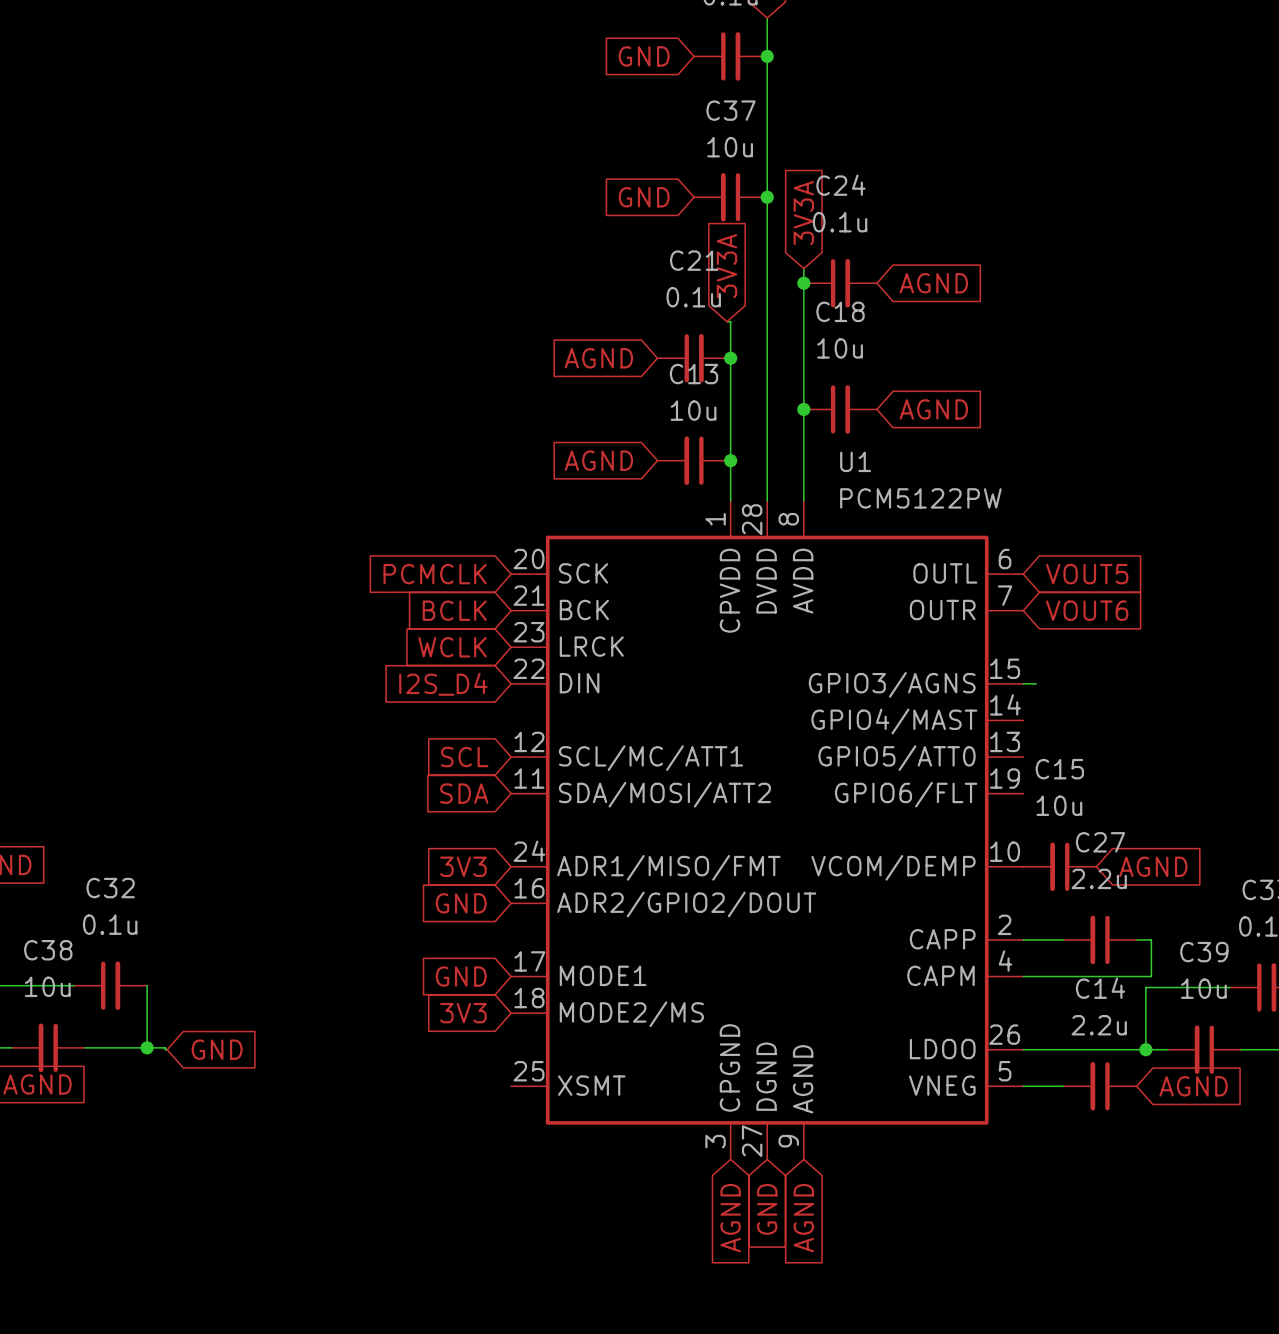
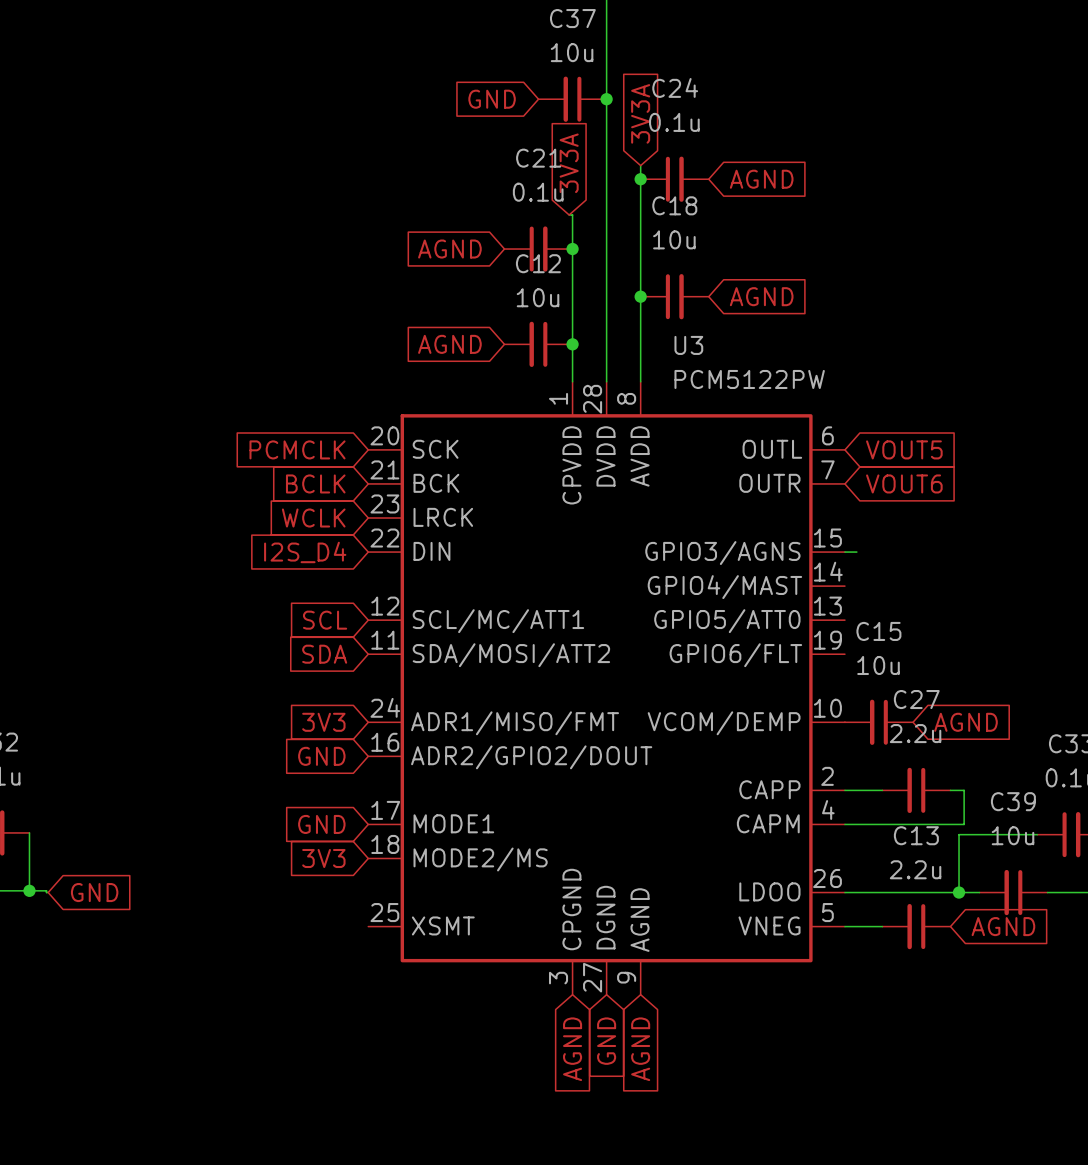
C13 name: C13 (693, 374) -> C12 (538, 263)
U1 name: U1 (855, 461) -> U3 (688, 345)
C14 name: C14 (1100, 988) -> C13 (916, 835)

